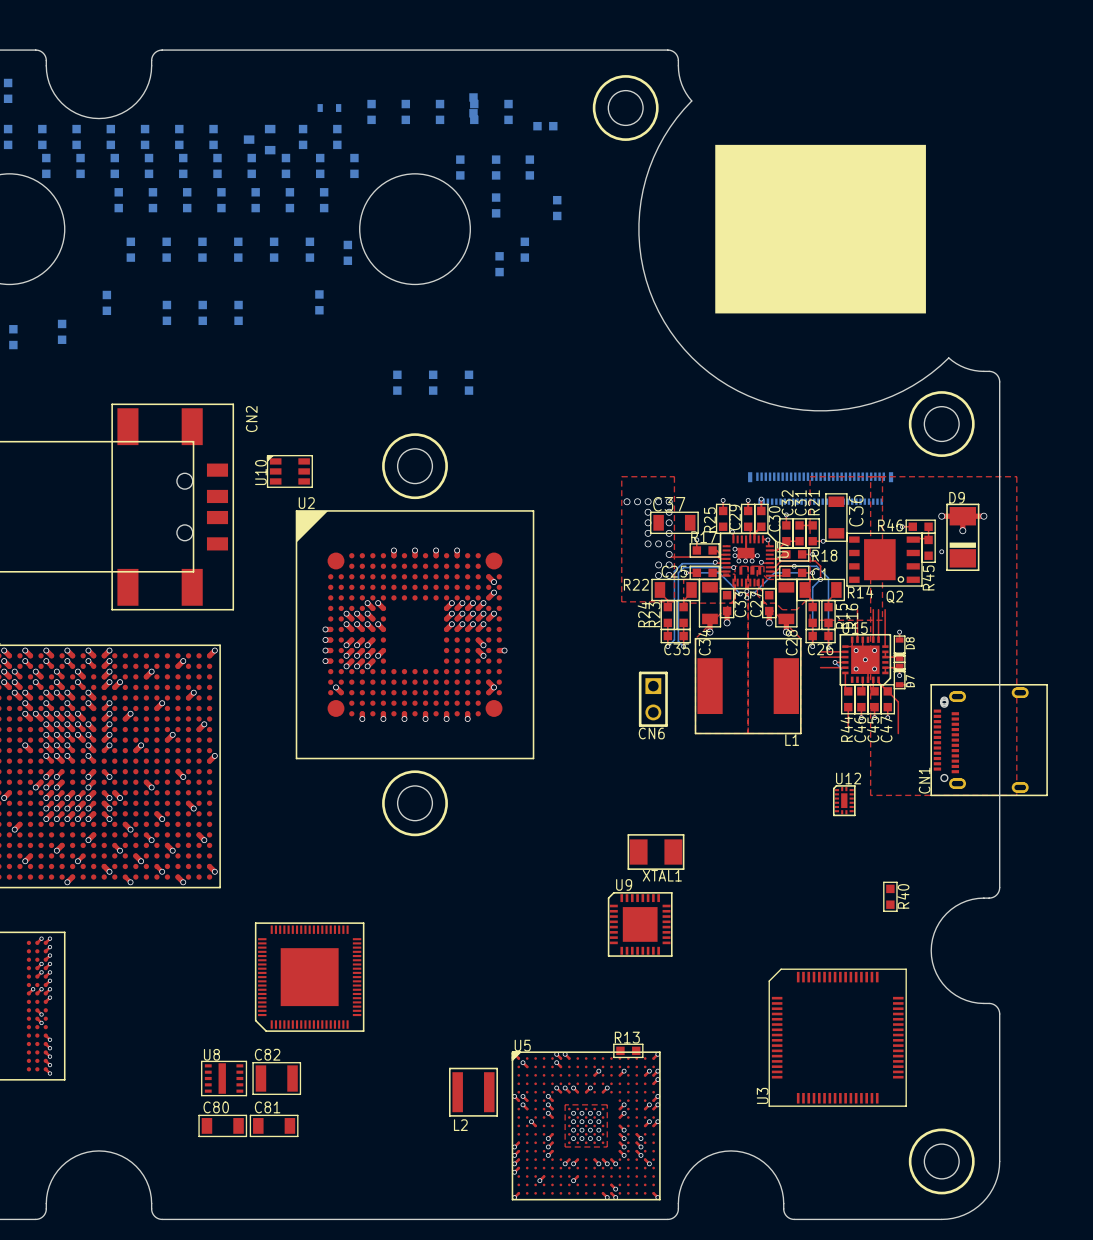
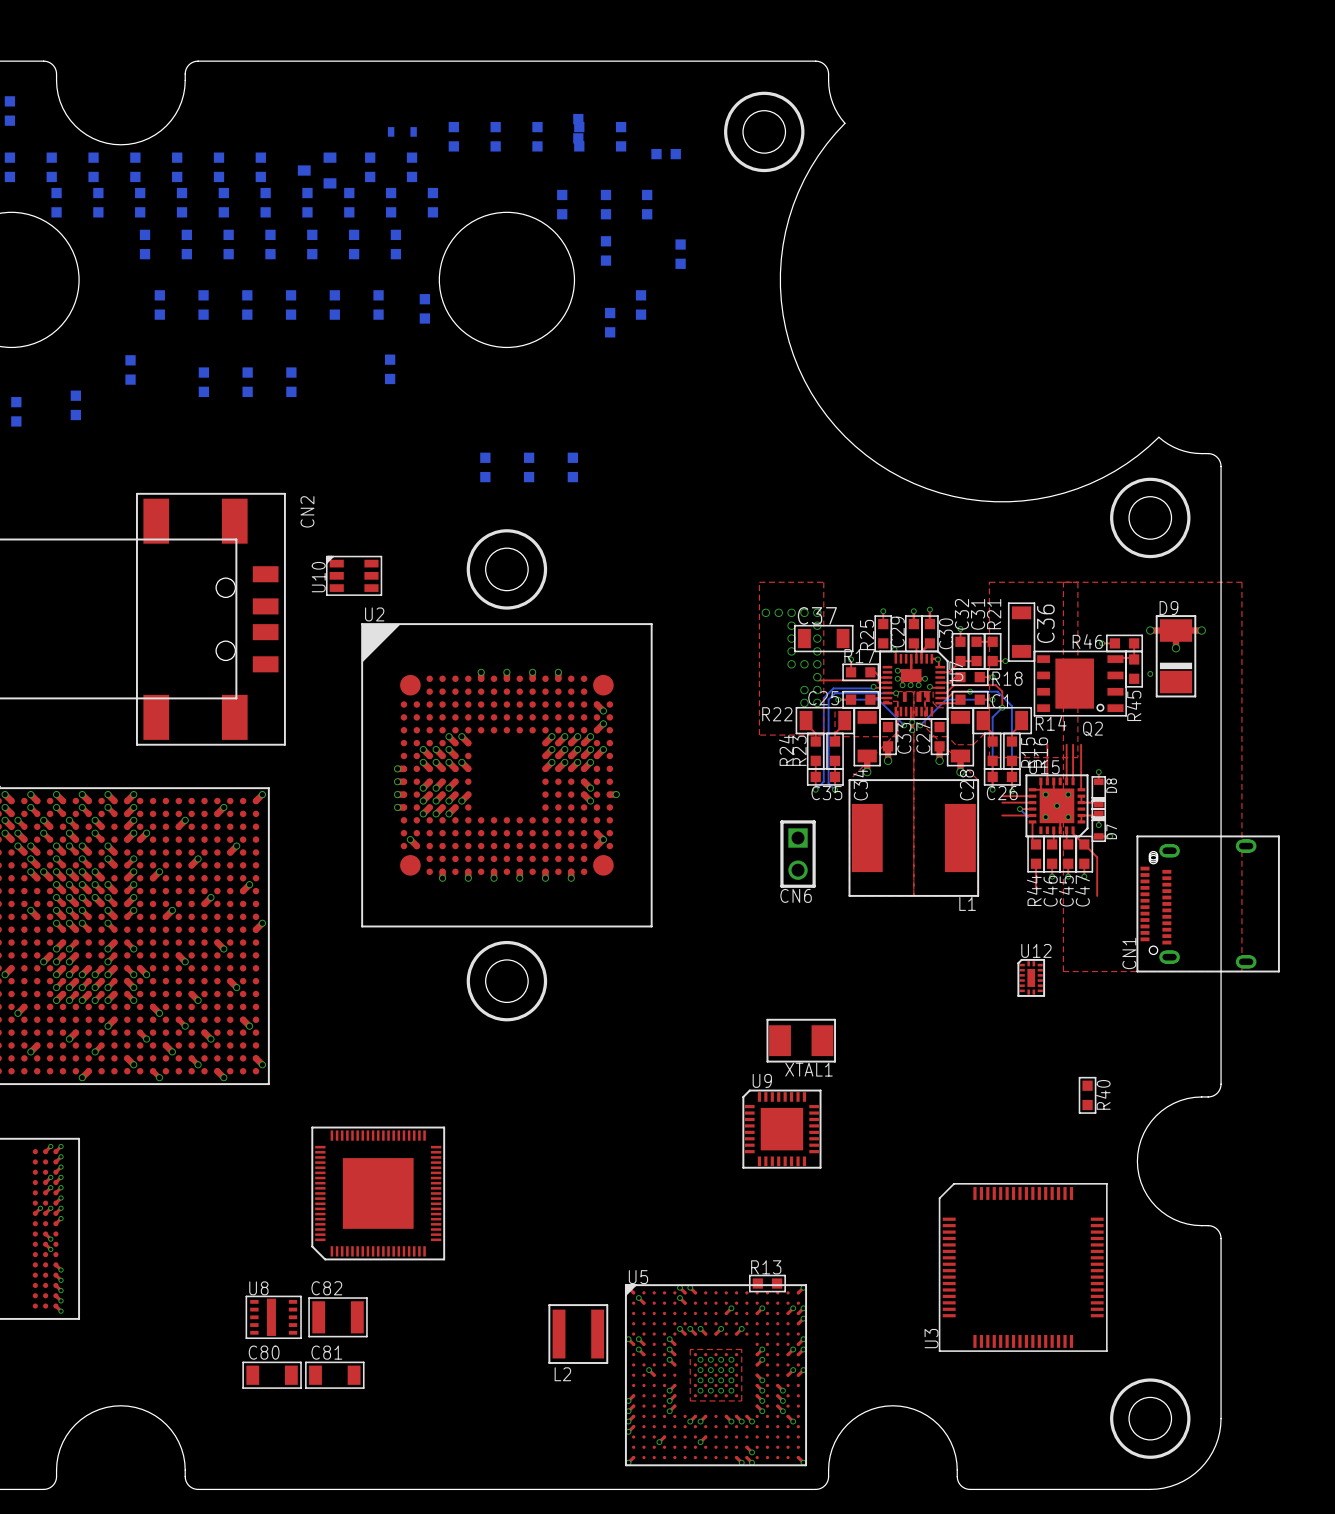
drawing: [715, 144, 926, 314] -> none
part: (820, 488) -> none

